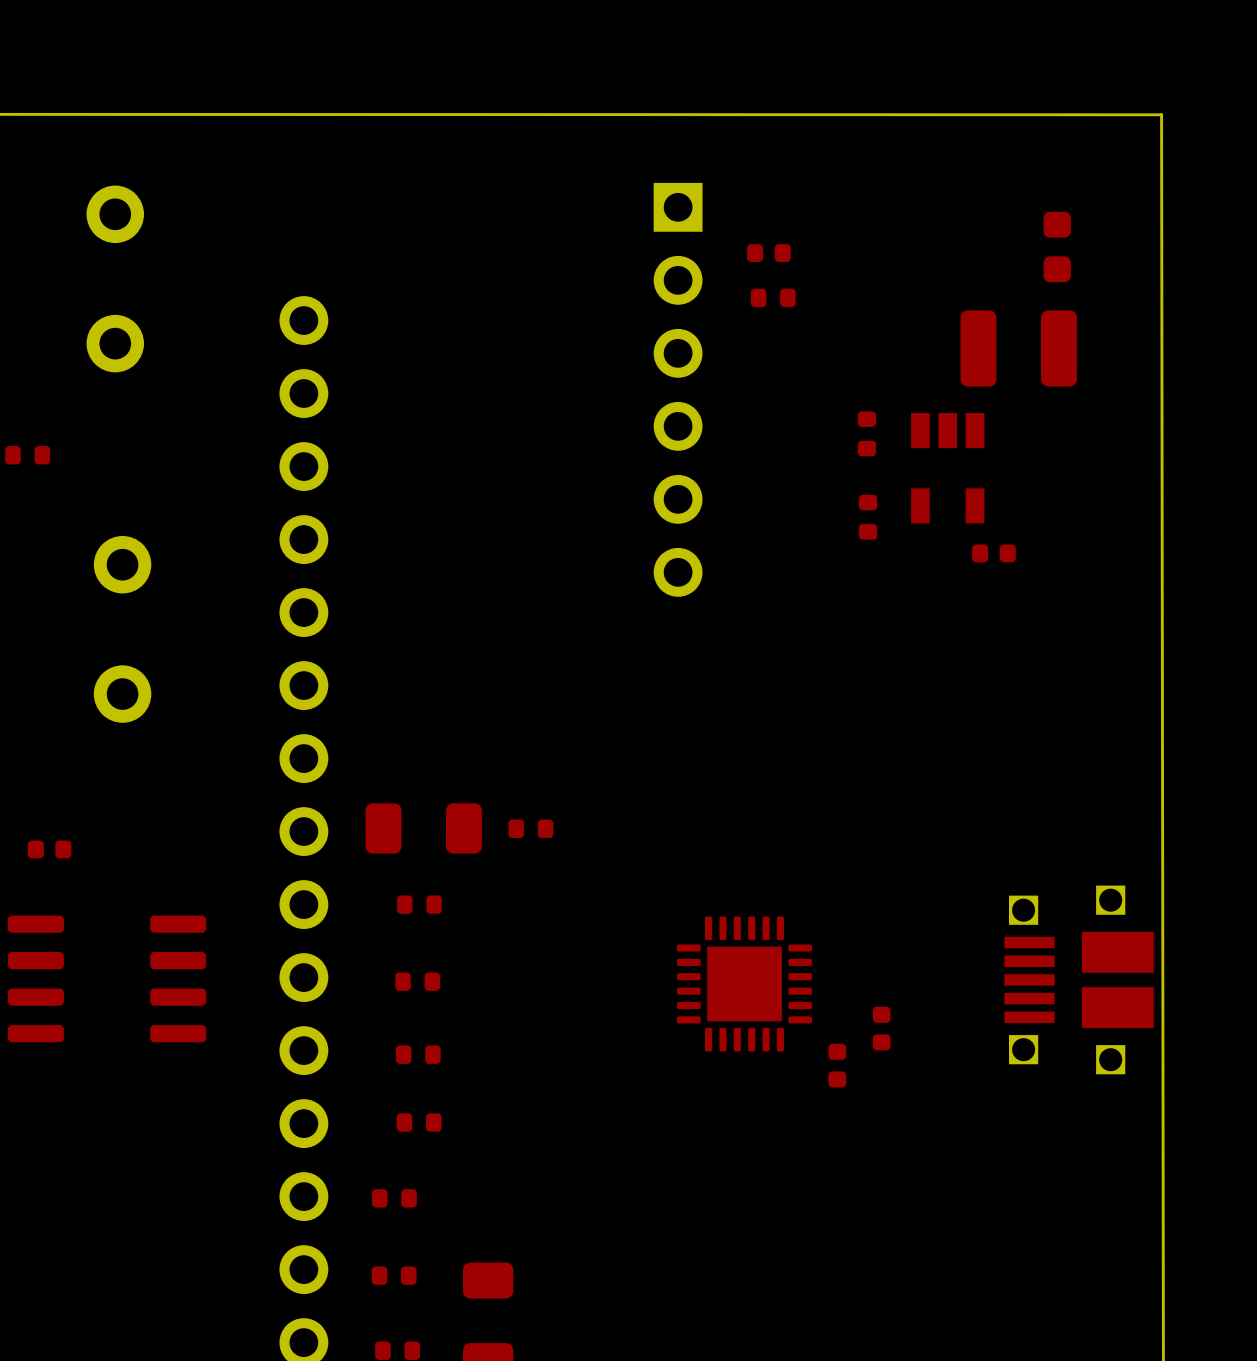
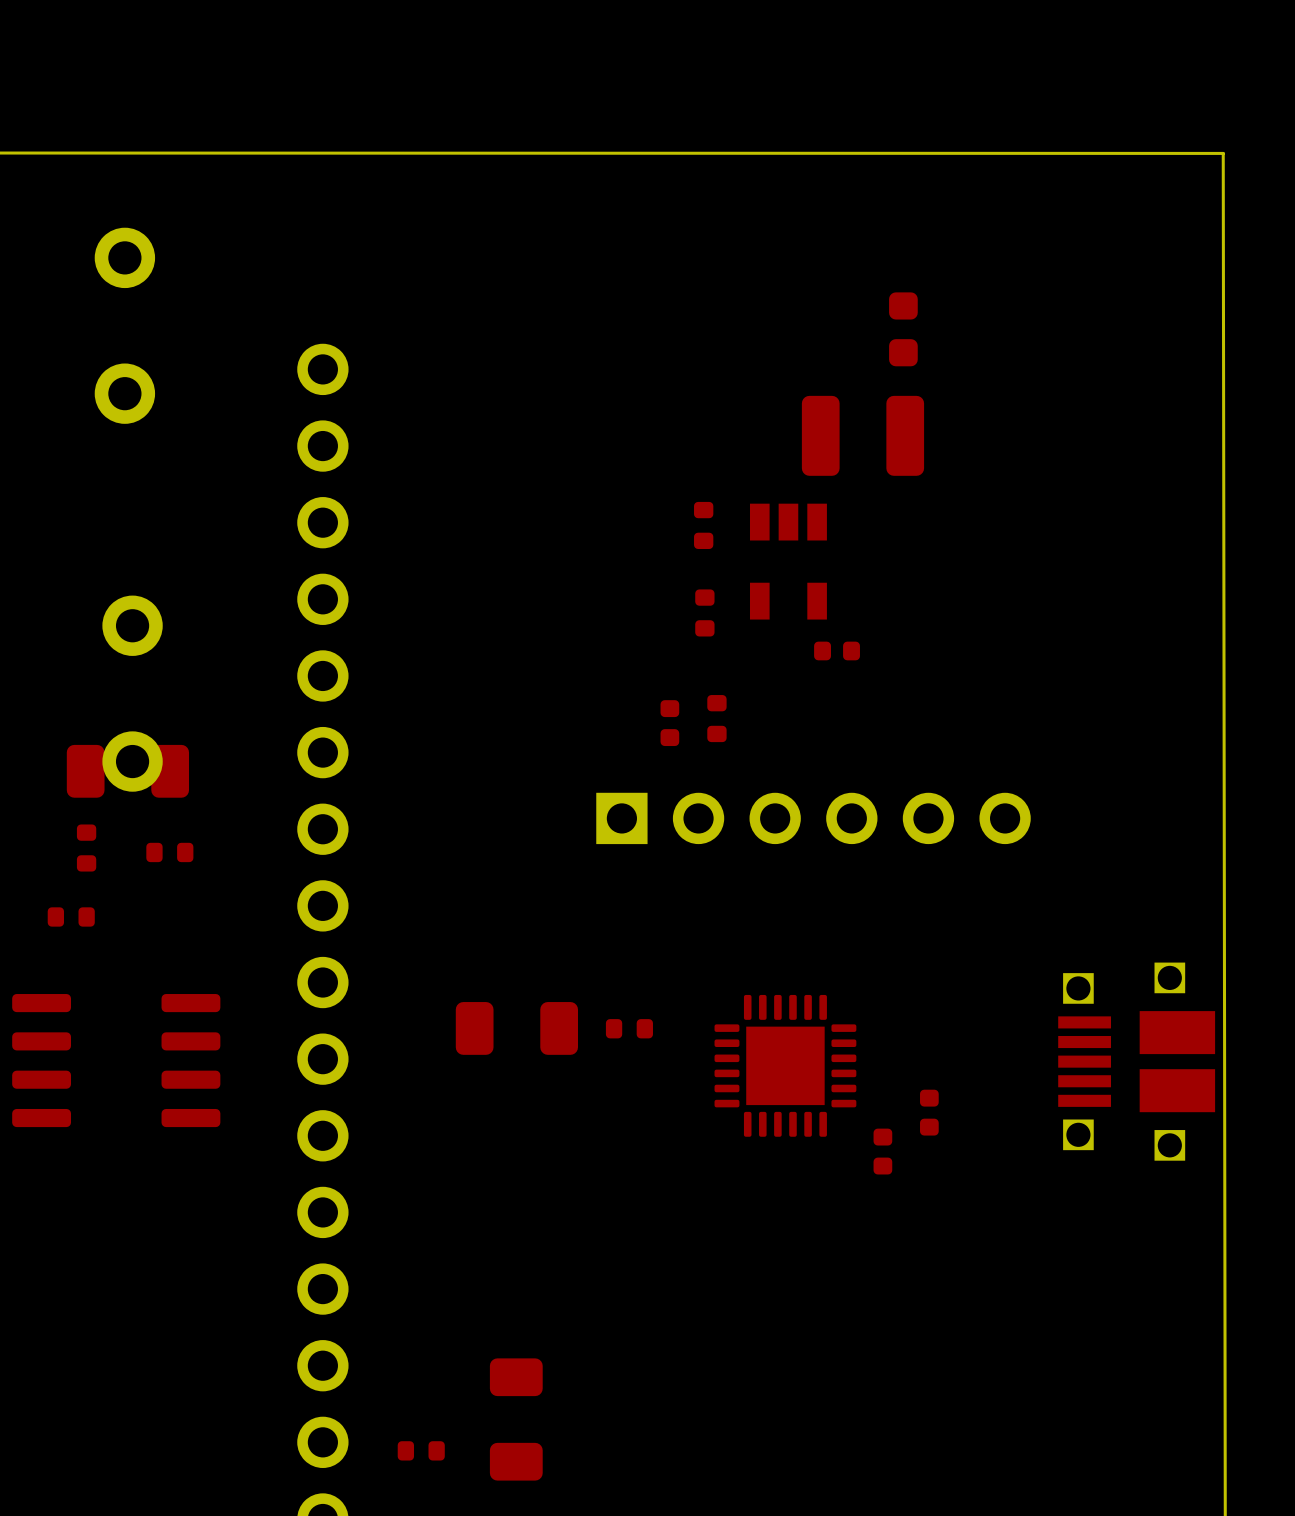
part position: (1057, 247) -> (903, 329)
part: (768, 253) -> none
part: (773, 297) -> none
part position: (1018, 348) -> (862, 435)
part rotation: 0° (678, 389) -> 90° counterclockwise (813, 818)
part position: (678, 389) -> (813, 818)
part: (866, 433) -> none
part: (27, 455) -> none
part position: (947, 468) -> (788, 561)
part: none -> (703, 525)
part: (868, 517) -> none
part: none -> (704, 612)
part: (993, 553) -> none
part: none -> (837, 650)
part: none -> (716, 718)
part: none -> (669, 723)
part: none -> (127, 771)
part: none -> (86, 848)
part: none -> (169, 852)
part position: (423, 828) -> (516, 1028)
part: (530, 828) -> none
part footprint: [27, 840, 72, 859] -> [47, 907, 95, 927]
part: (419, 904) -> none
part: none -> (629, 1028)
part: (417, 981) -> none
part: (418, 1054) -> none
part: (419, 1122) -> none
part: (394, 1198) -> none
part: (394, 1275) -> none

